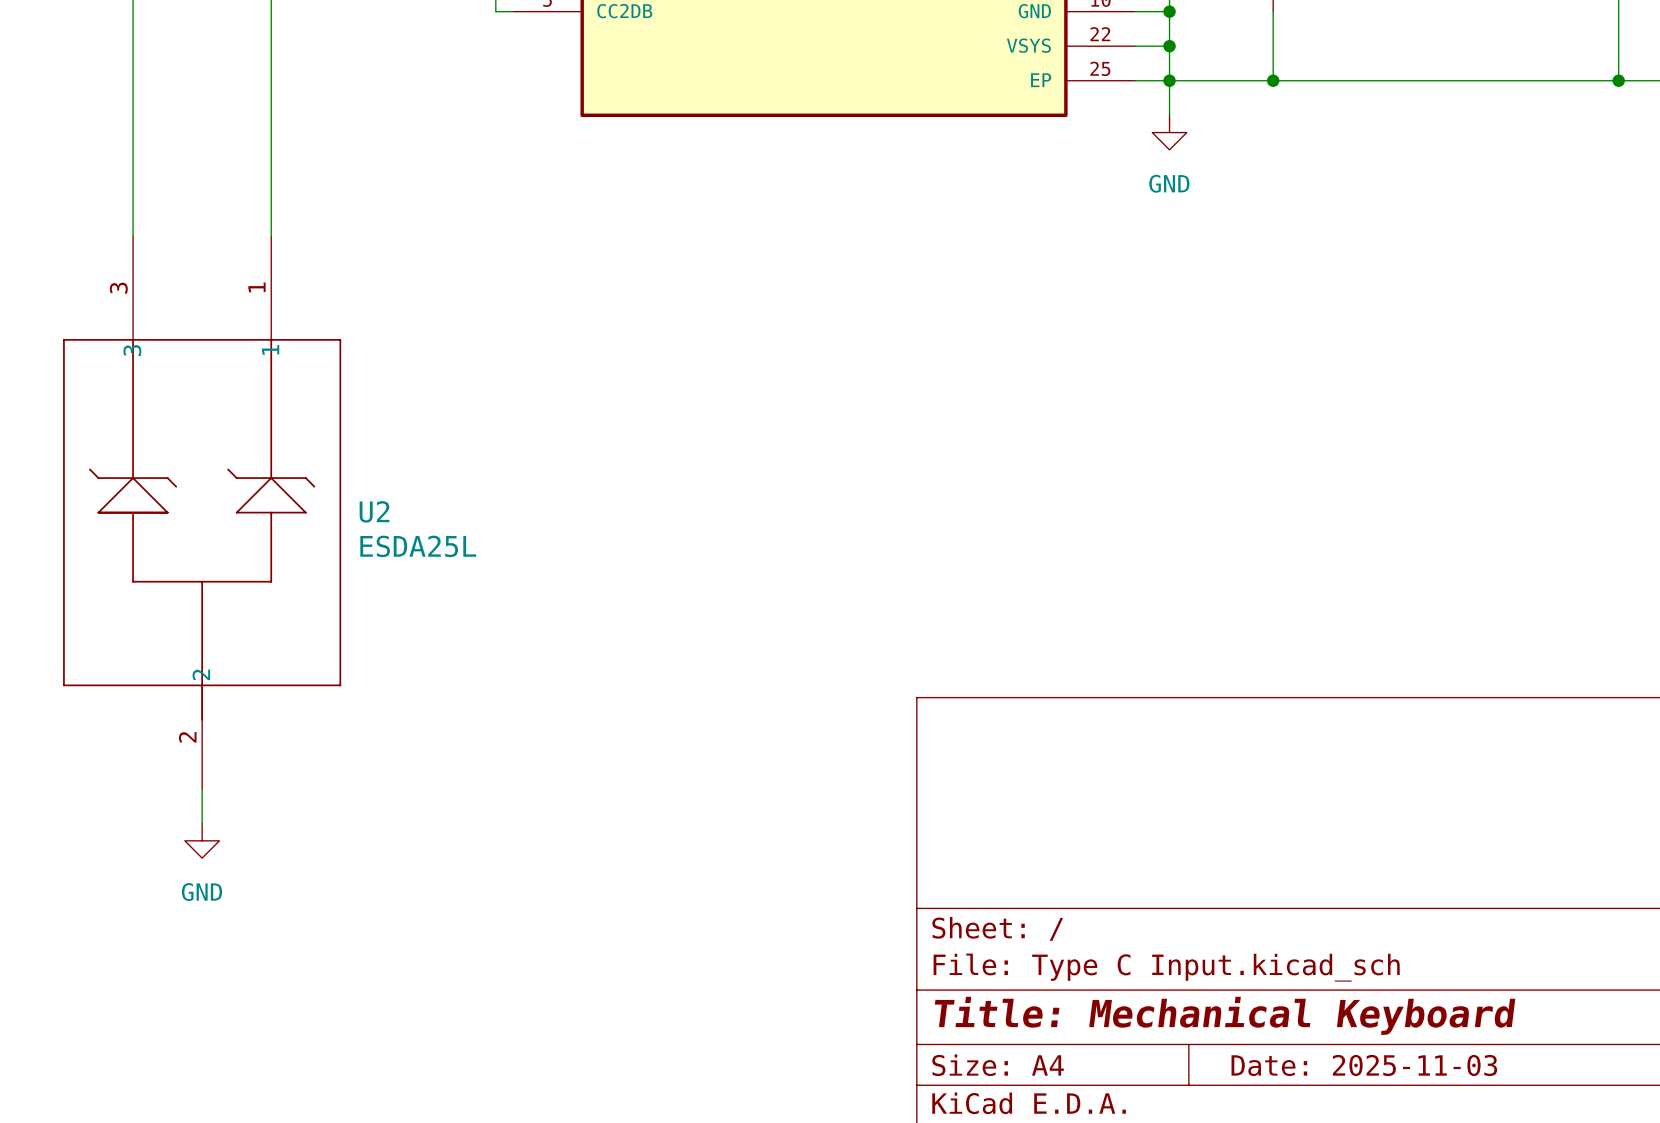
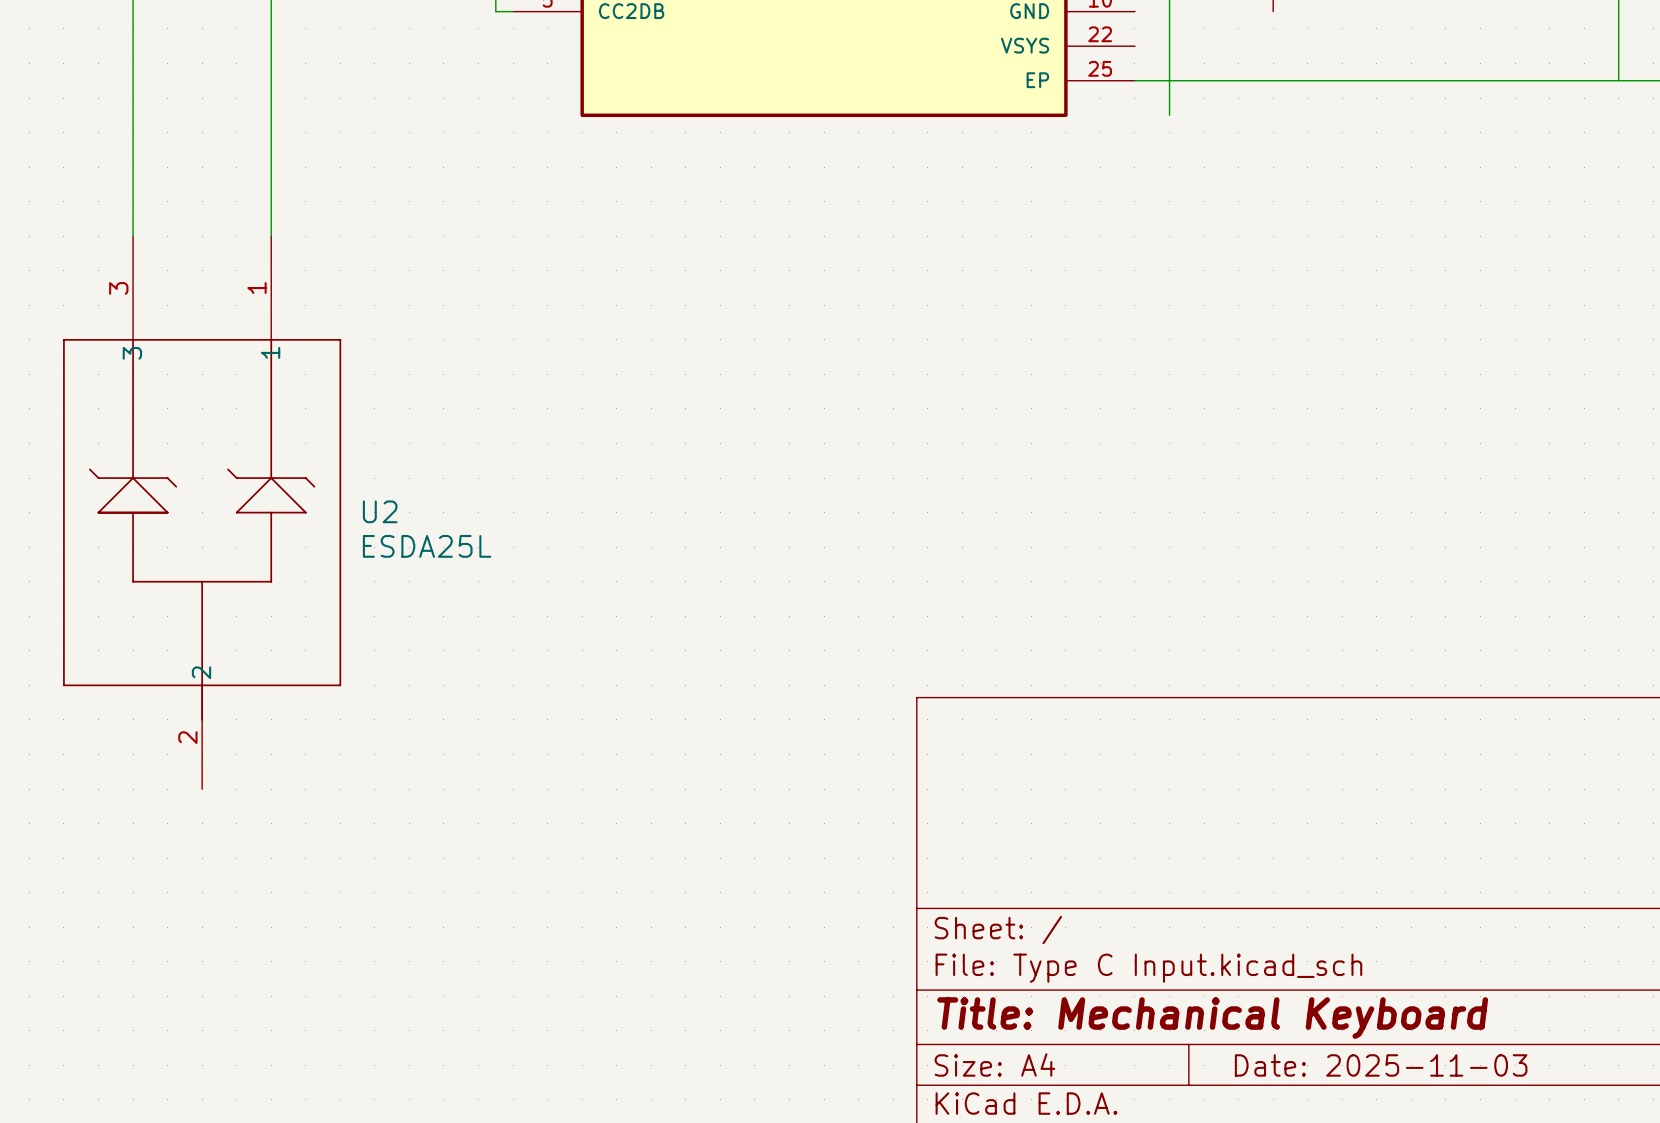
wire: (1134, 11) (1169, 11) -> none
junction: (1169, 11) -> none
wire: (1273, 11) (1273, 80) -> none
wire: (1134, 46) (1169, 46) -> none
junction: (1169, 46) -> none
junction: (1169, 80) -> none
junction: (1273, 80) -> none
junction: (1618, 80) -> none
power symbol: GND (1169, 132) -> none
wire: (202, 789) (202, 823) -> none
power symbol: GND (202, 840) -> none

